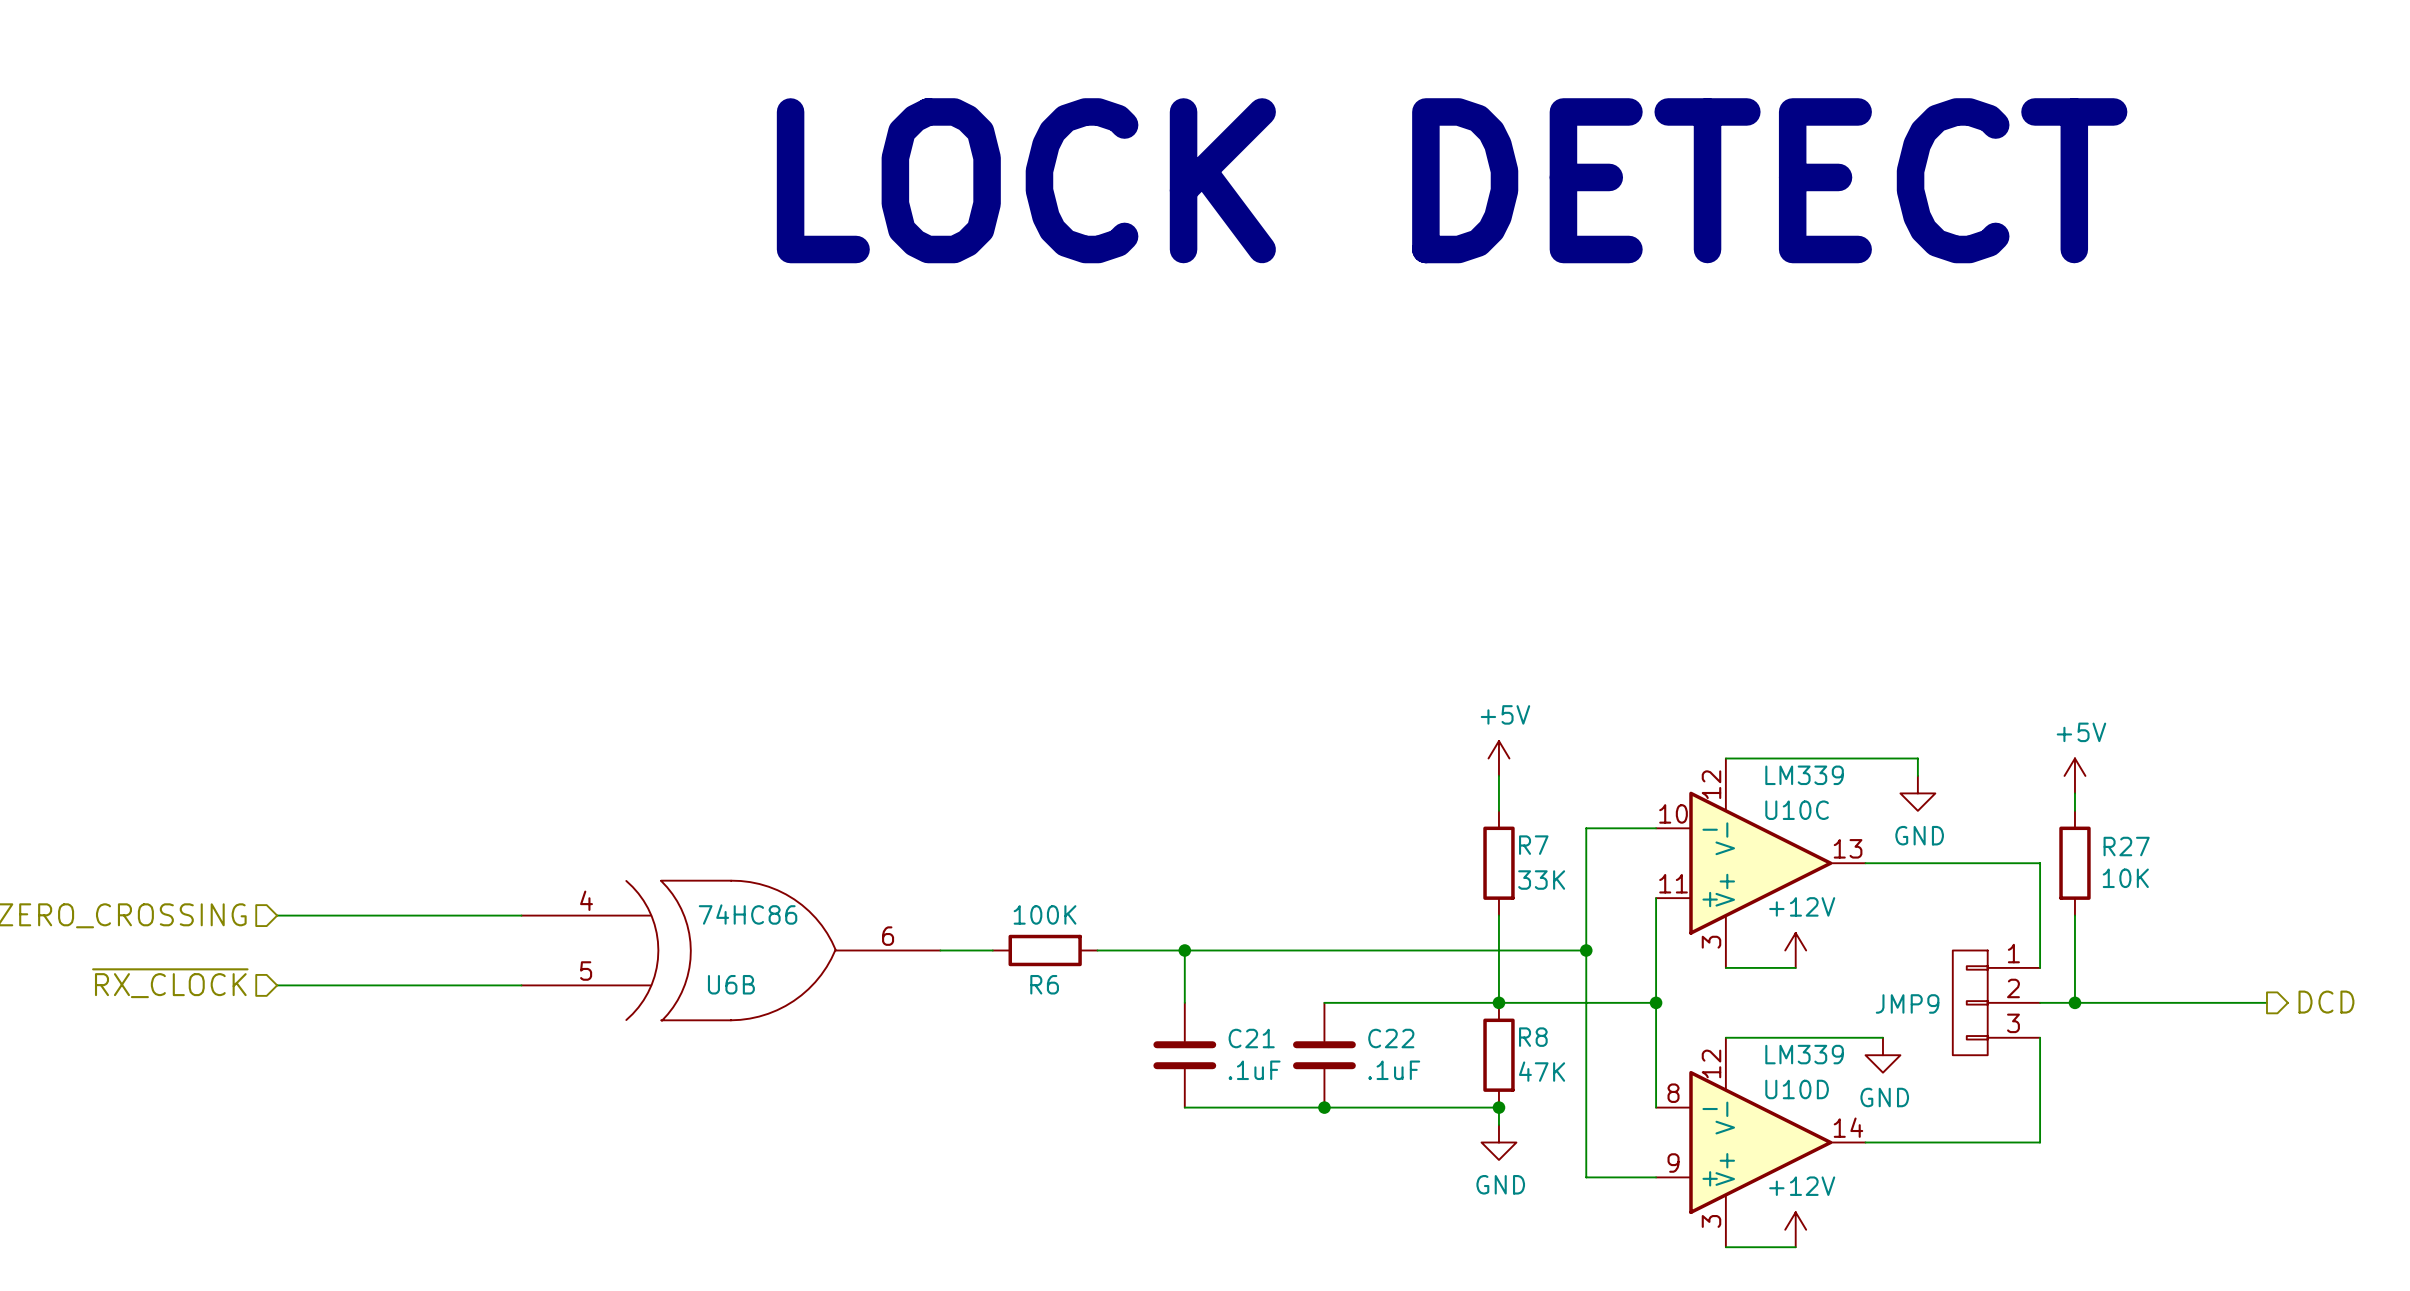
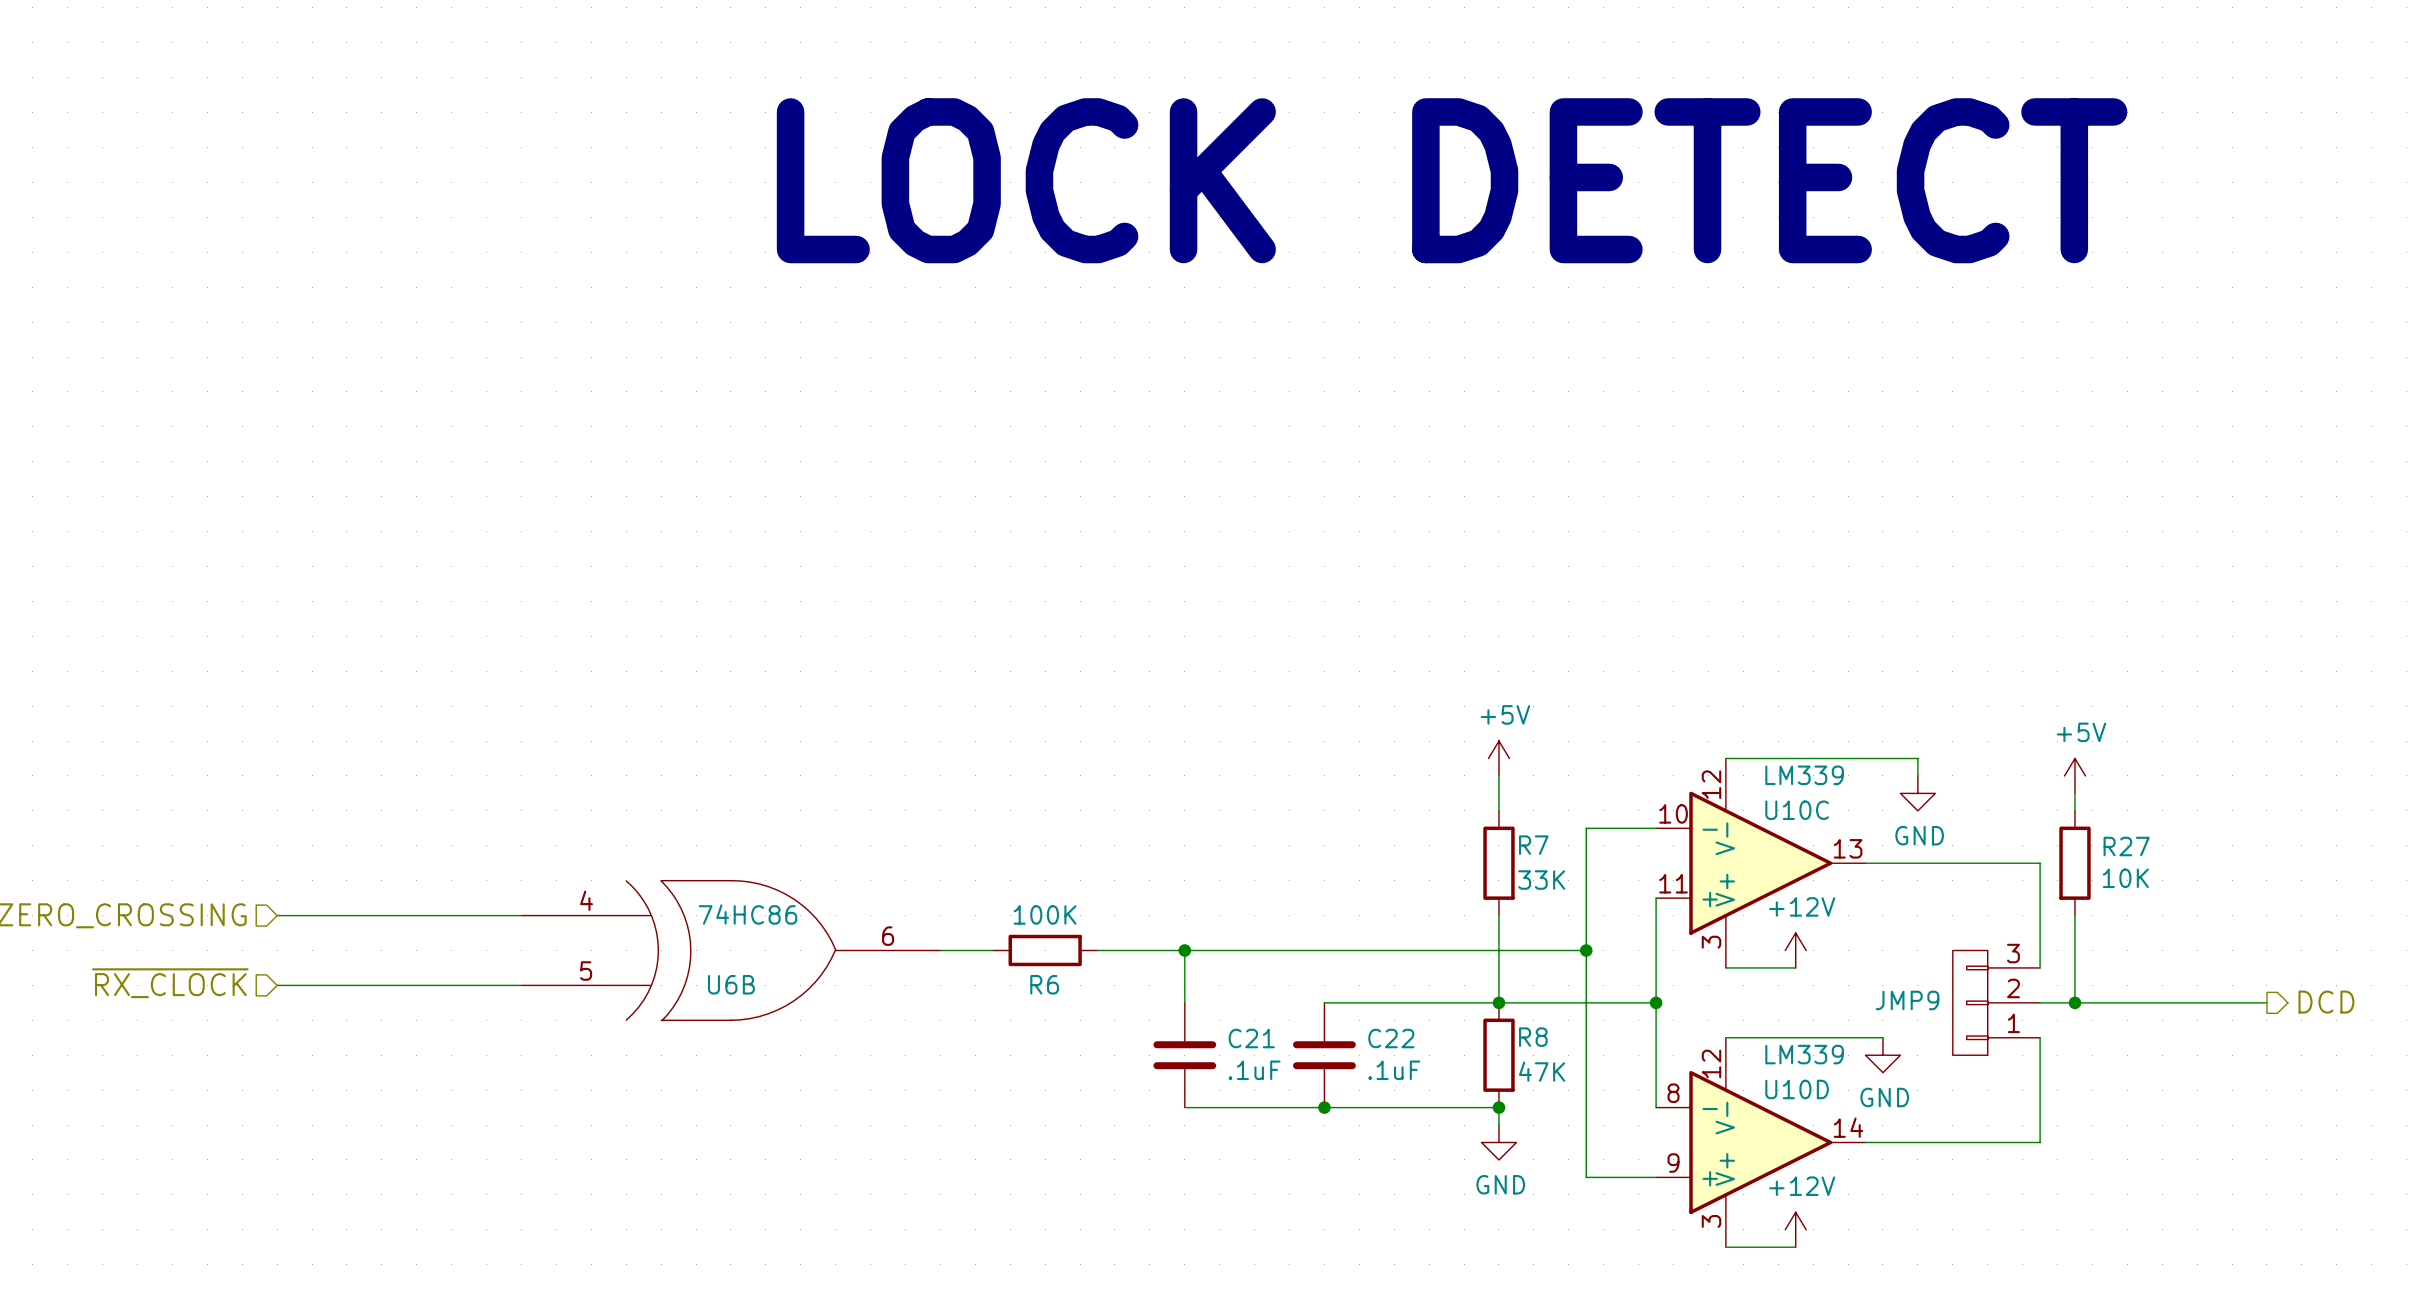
JMP9 flip: as is (1970, 1002) -> up-down (1970, 1002)

